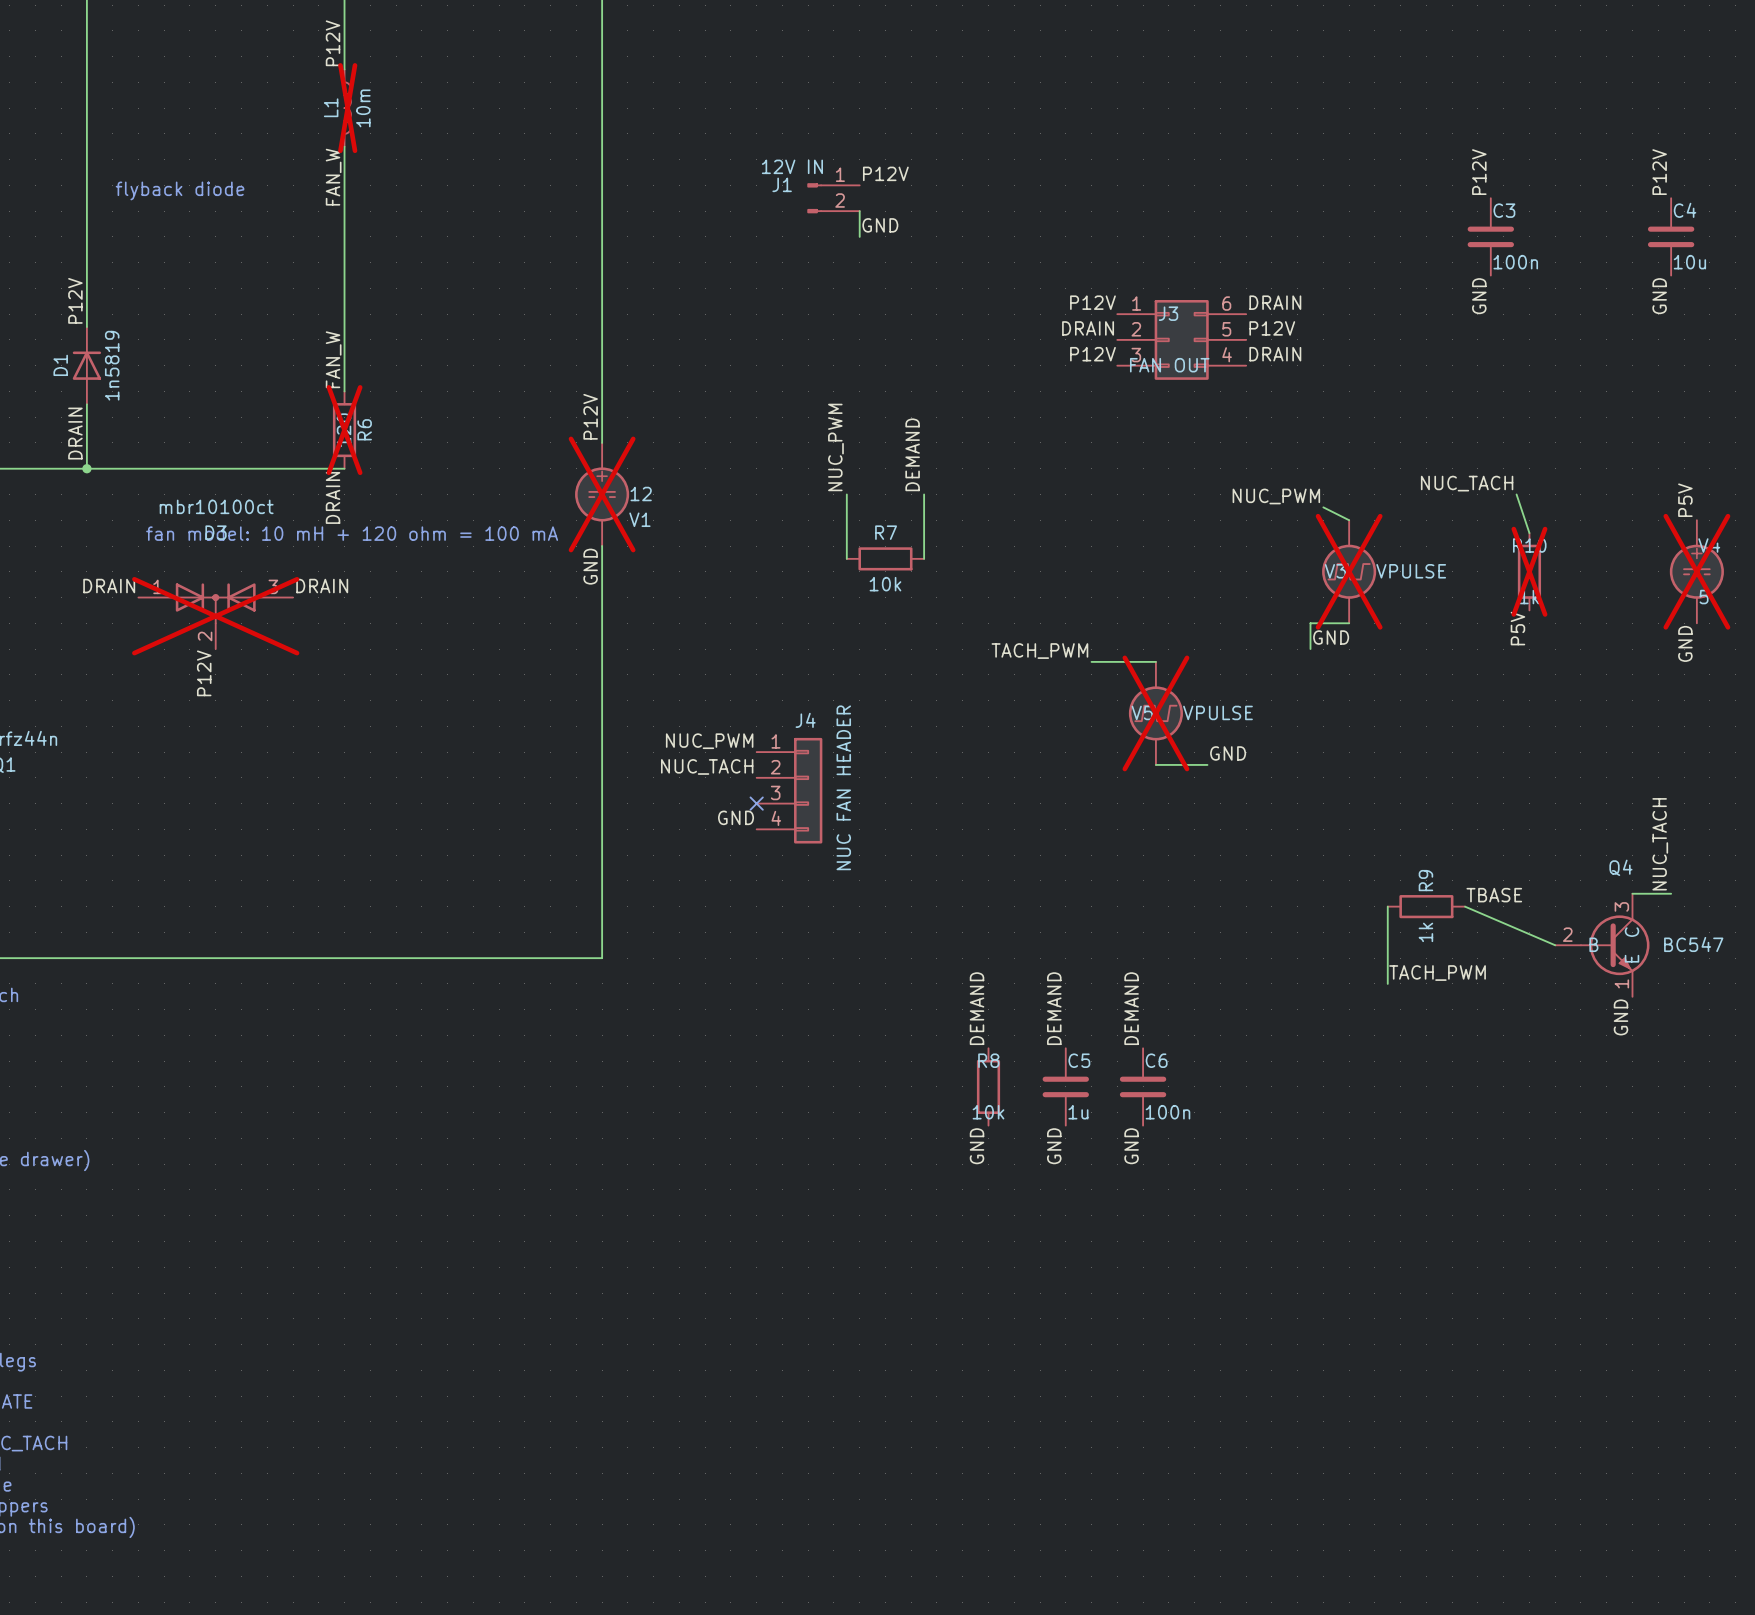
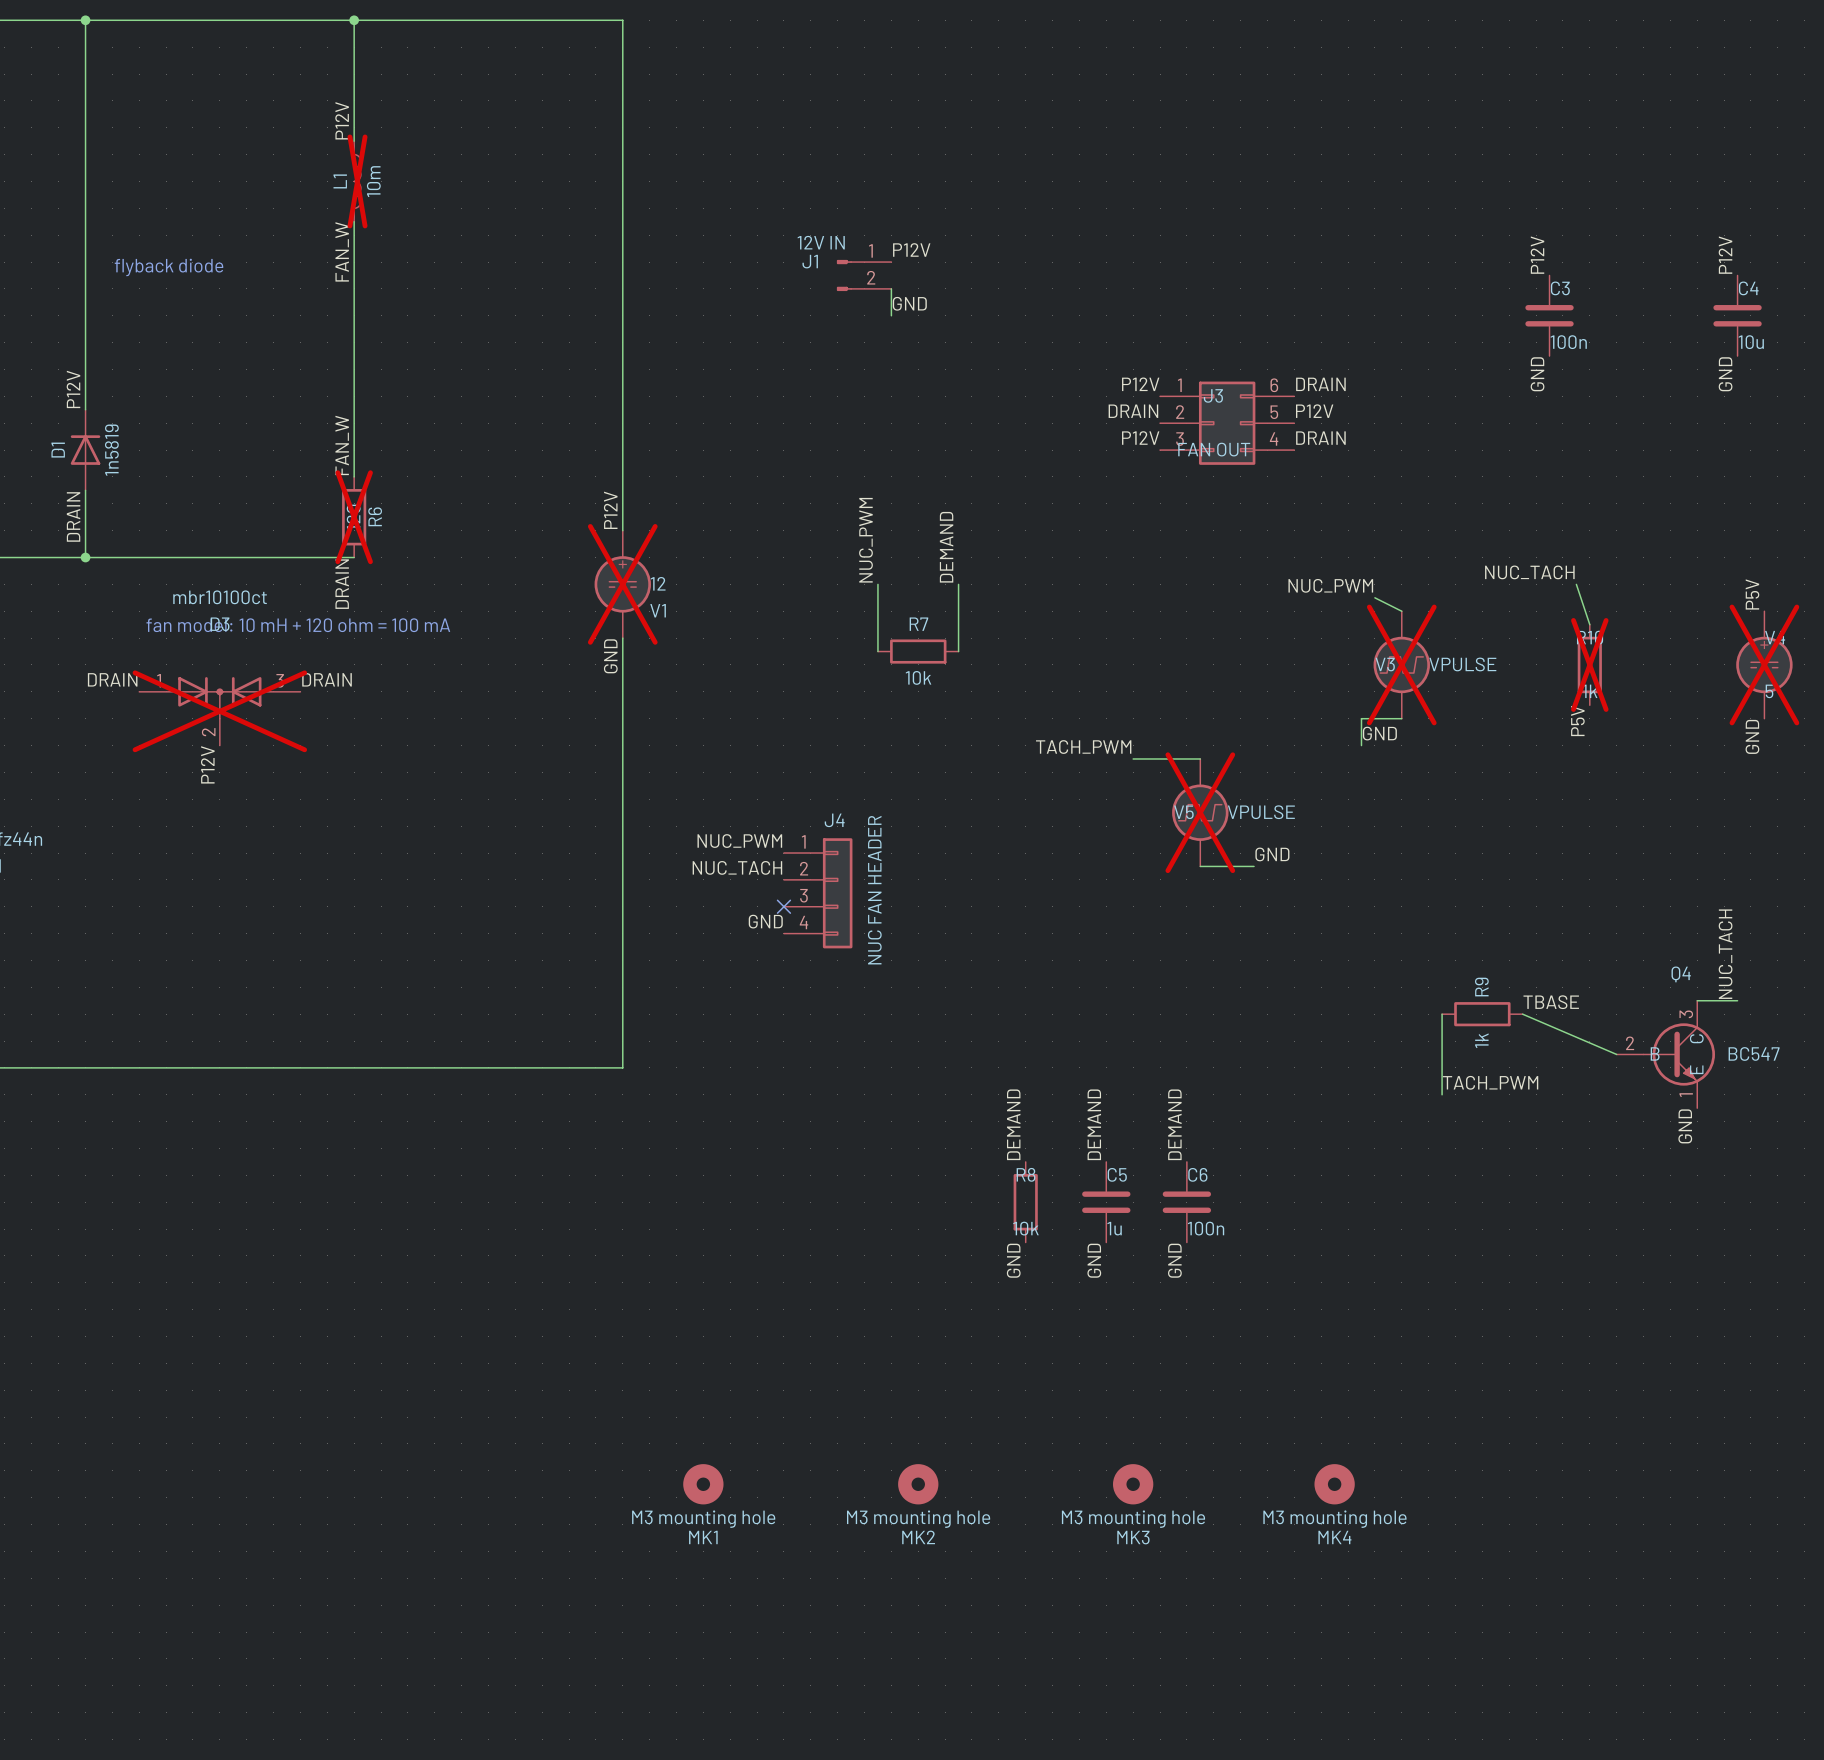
MK1: none -> M3 mounting hole (703, 1484)
MK2: none -> M3 mounting hole (918, 1484)
MK3: none -> M3 mounting hole (1133, 1484)
MK4: none -> M3 mounting hole (1334, 1484)

